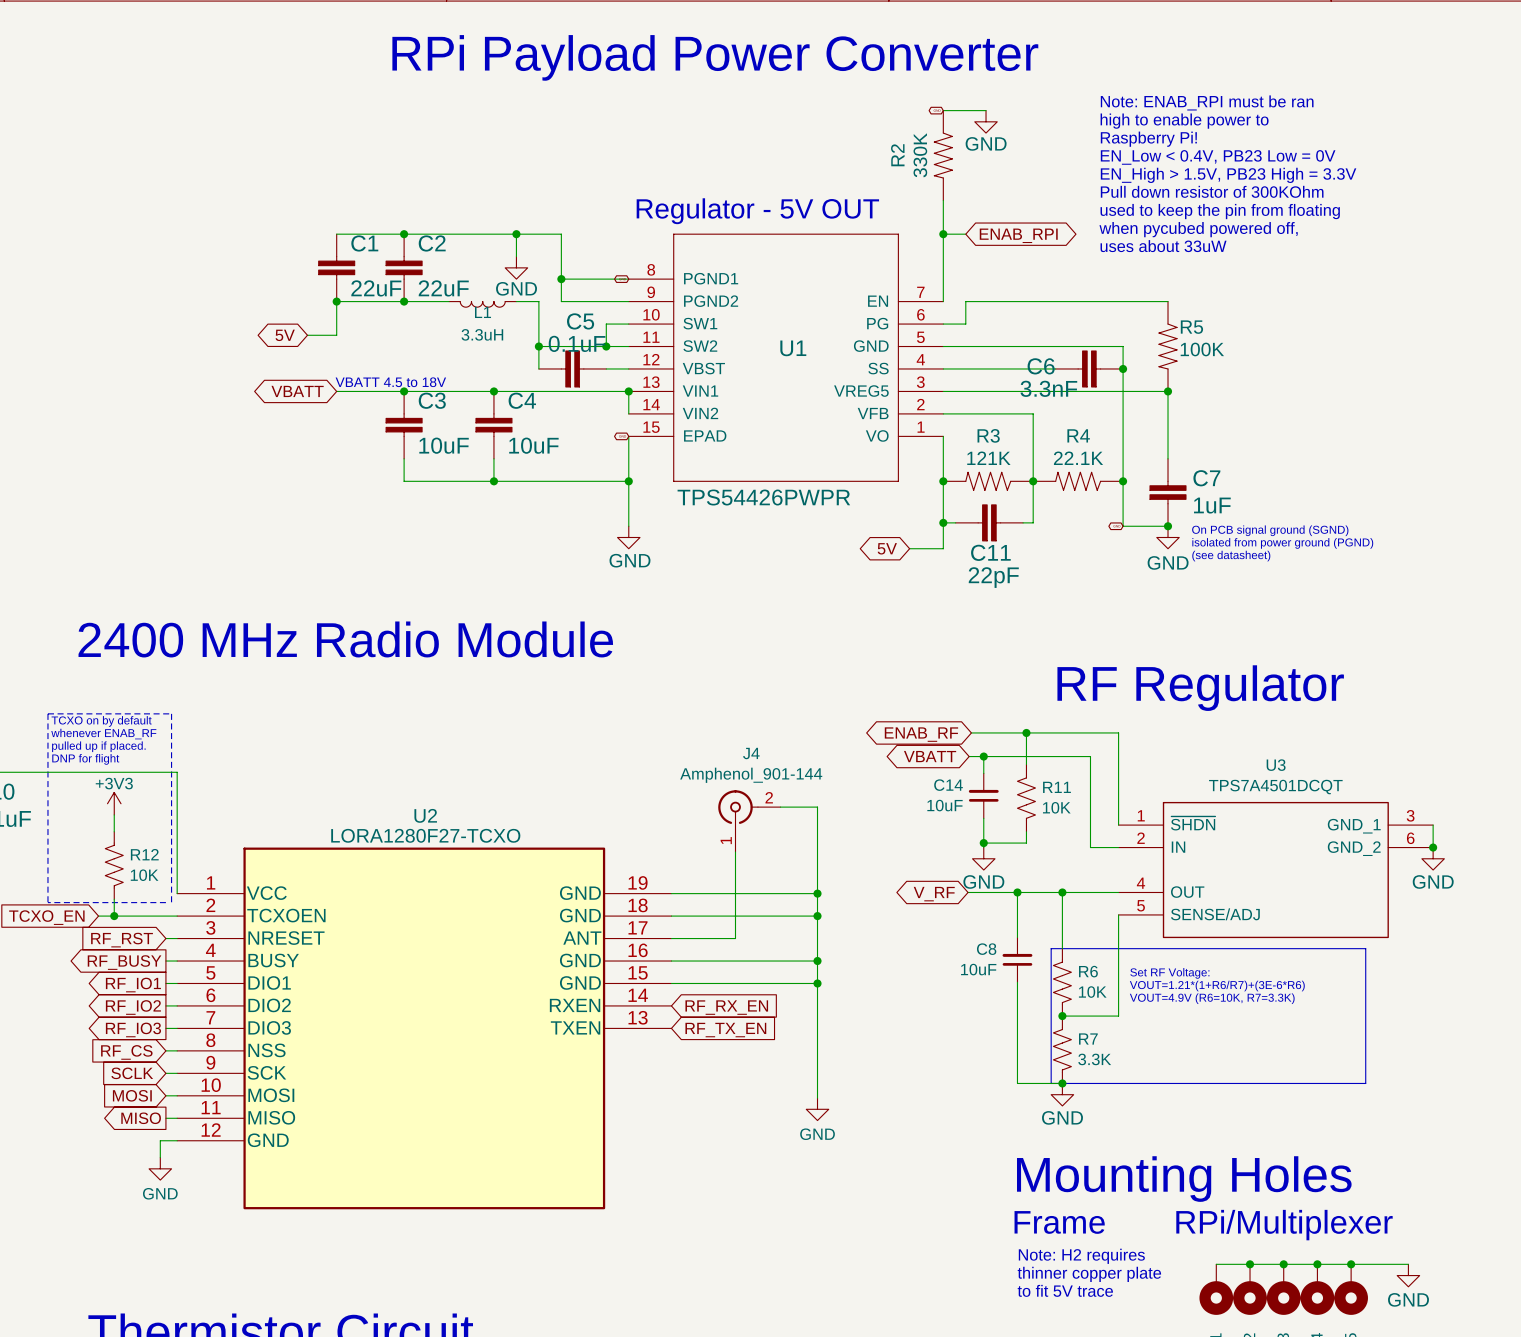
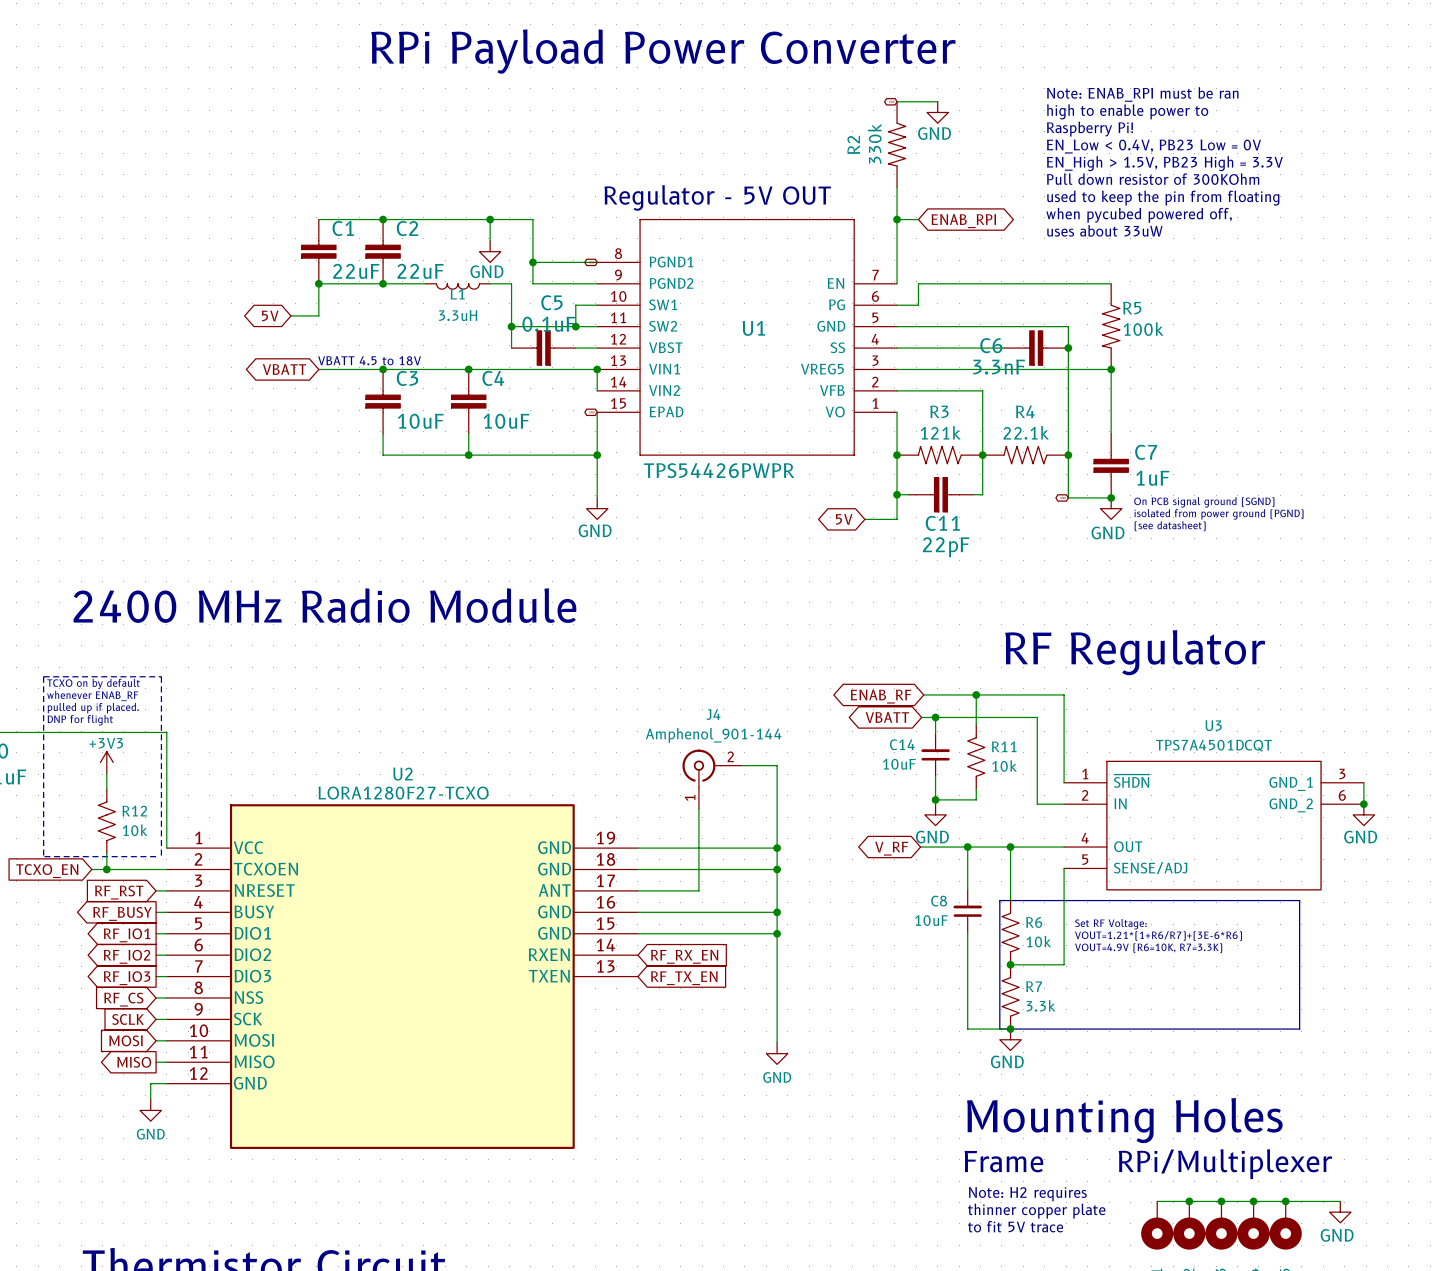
R2 value: 330K (920, 155) -> 330k (874, 143)
R5 value: 100K (1202, 349) -> 100k (1143, 329)
R3 value: 121K (988, 458) -> 121k (940, 432)
R4 value: 22.1K (1078, 458) -> 22.1k (1026, 432)
R11 value: 10K (1056, 807) -> 10k (1004, 766)
R12 value: 10K (144, 875) -> 10k (135, 830)
R6 value: 10K (1092, 992) -> 10k (1038, 941)
R7 value: 3.3K (1094, 1059) -> 3.3k (1040, 1005)

